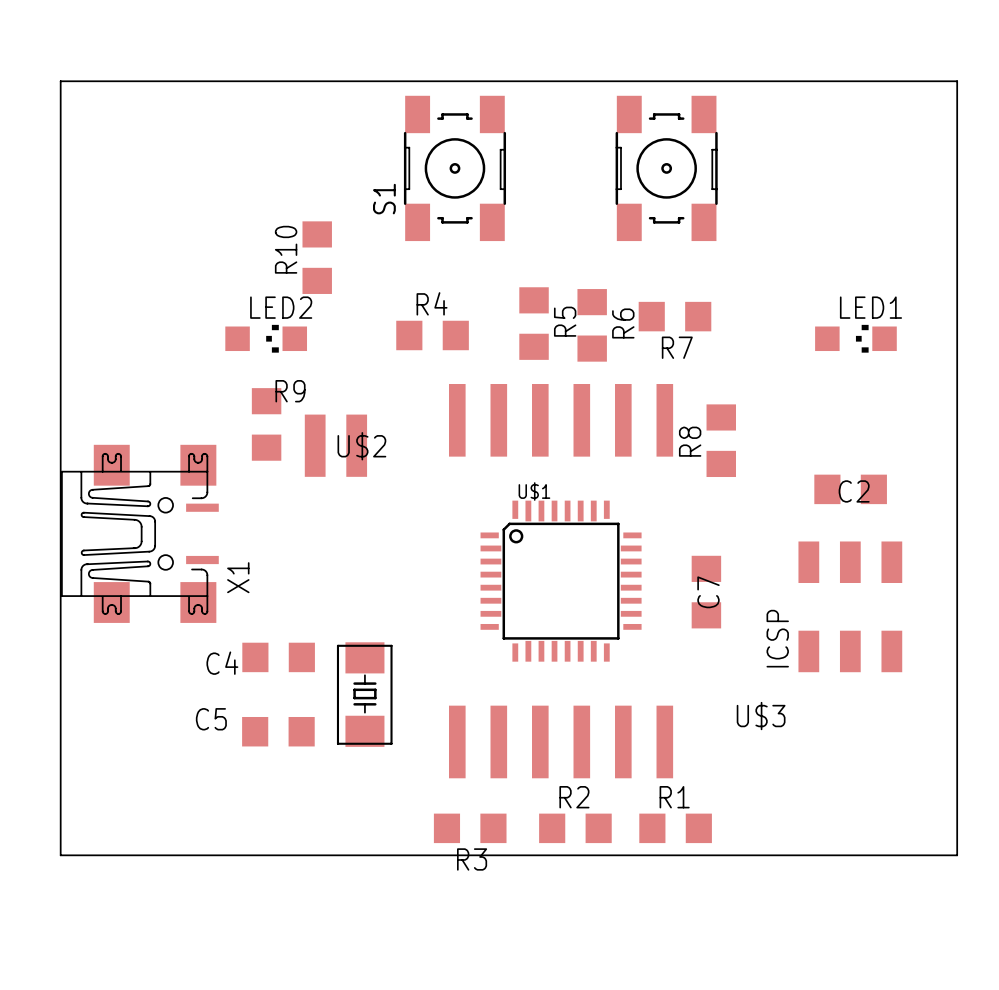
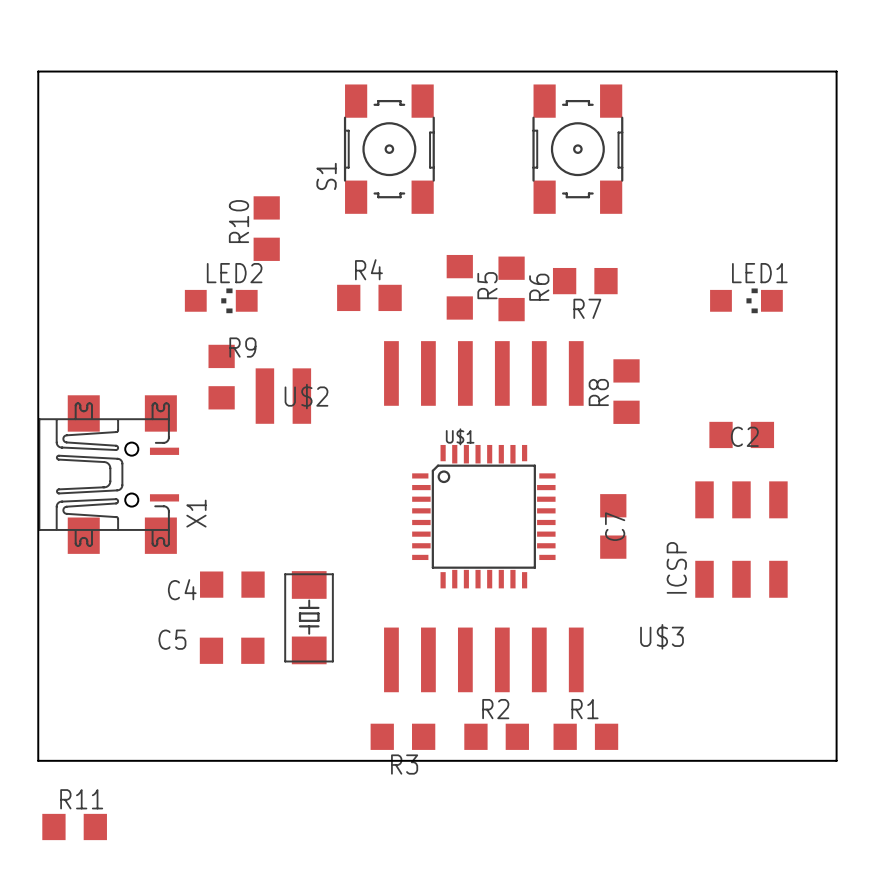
R11: none -> (74, 826)

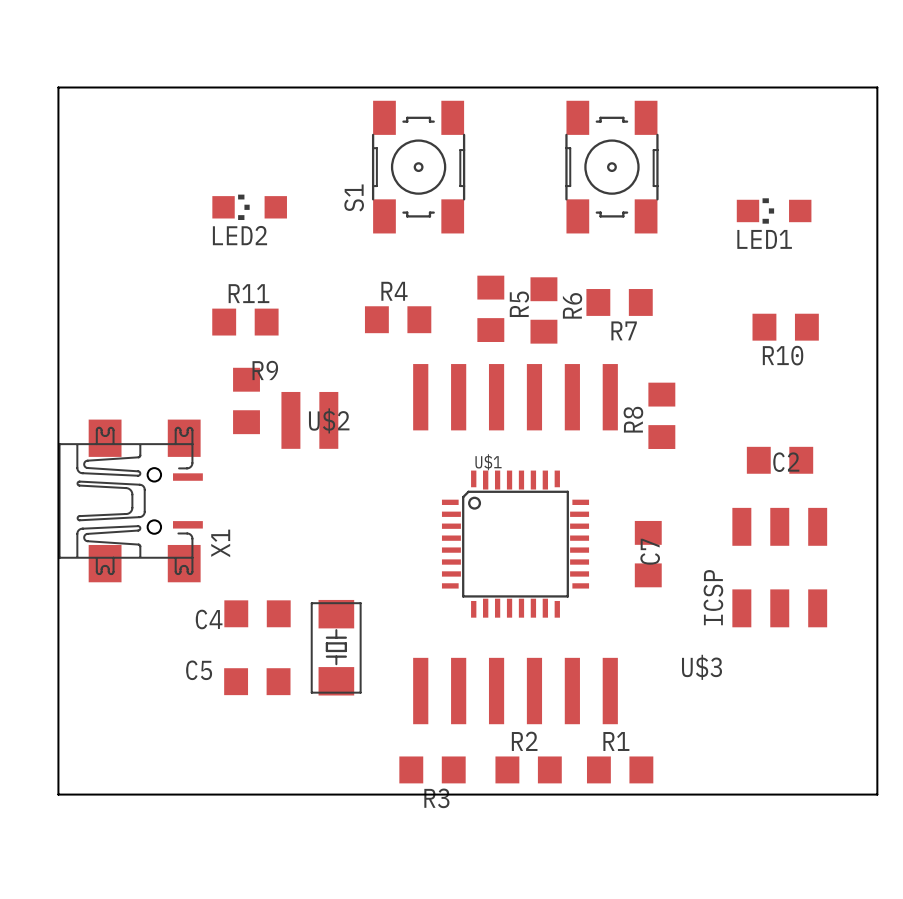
R10 name position: R10 (238, 221) -> R10 (783, 355)
R10 rotation: 0° (266, 228) -> 90° clockwise (785, 327)
R10 position: (266, 228) -> (785, 327)
LED2 rotation: 0° (221, 300) -> 180° (249, 207)
LED2 position: (221, 300) -> (249, 207)
LED1 rotation: 0° (746, 300) -> 180° (774, 210)
LED1 position: (746, 300) -> (774, 210)
R11 position: (74, 826) -> (245, 322)

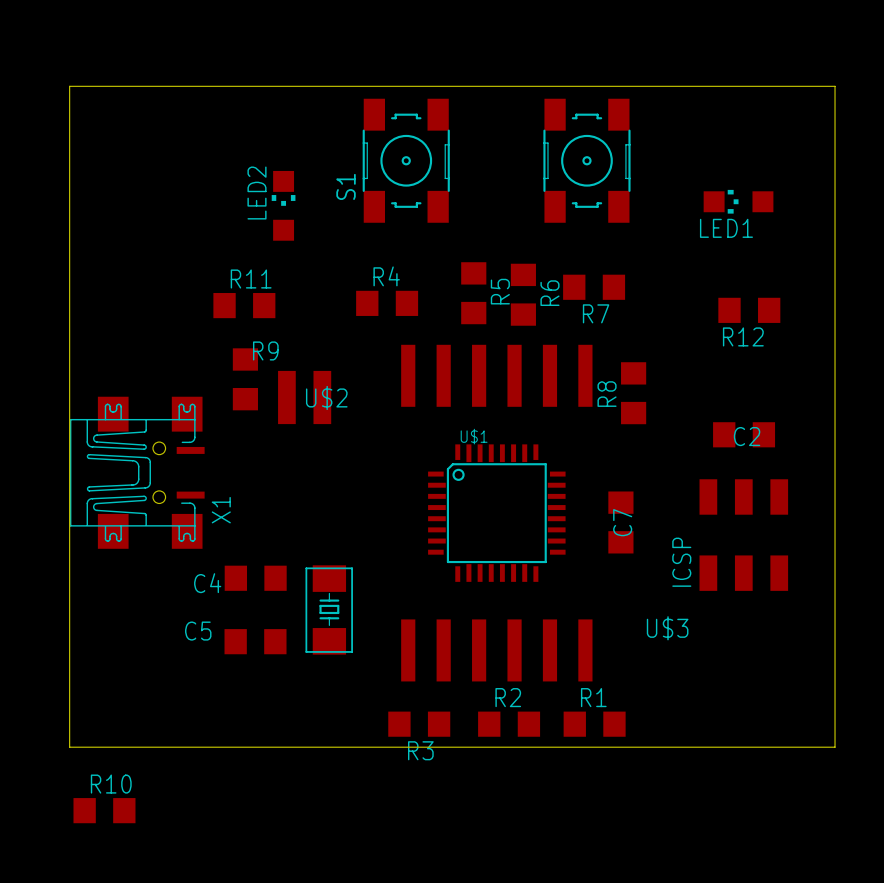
LED2 rotation: 0° (249, 207) -> 90° clockwise (283, 205)
R10 name: R10 (783, 355) -> R12 (743, 336)
R10: none -> (104, 810)

